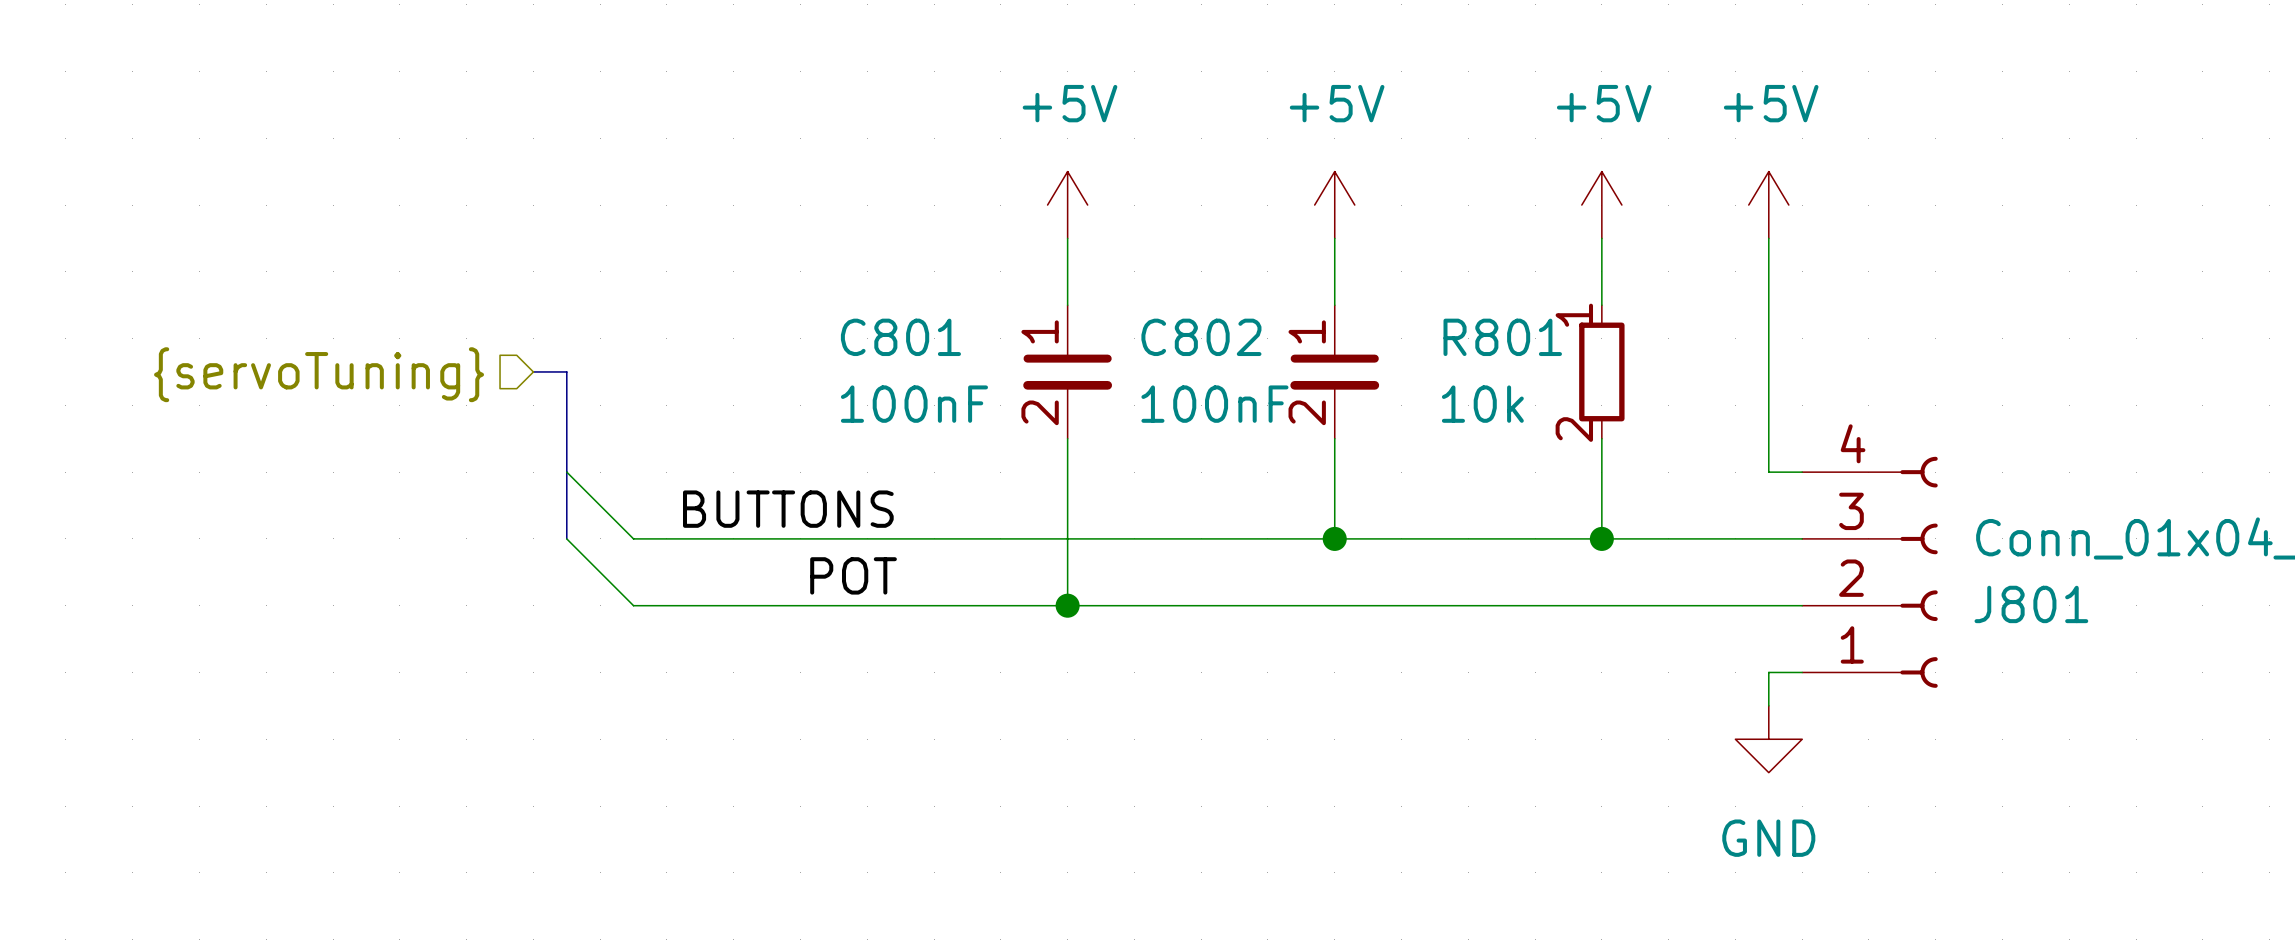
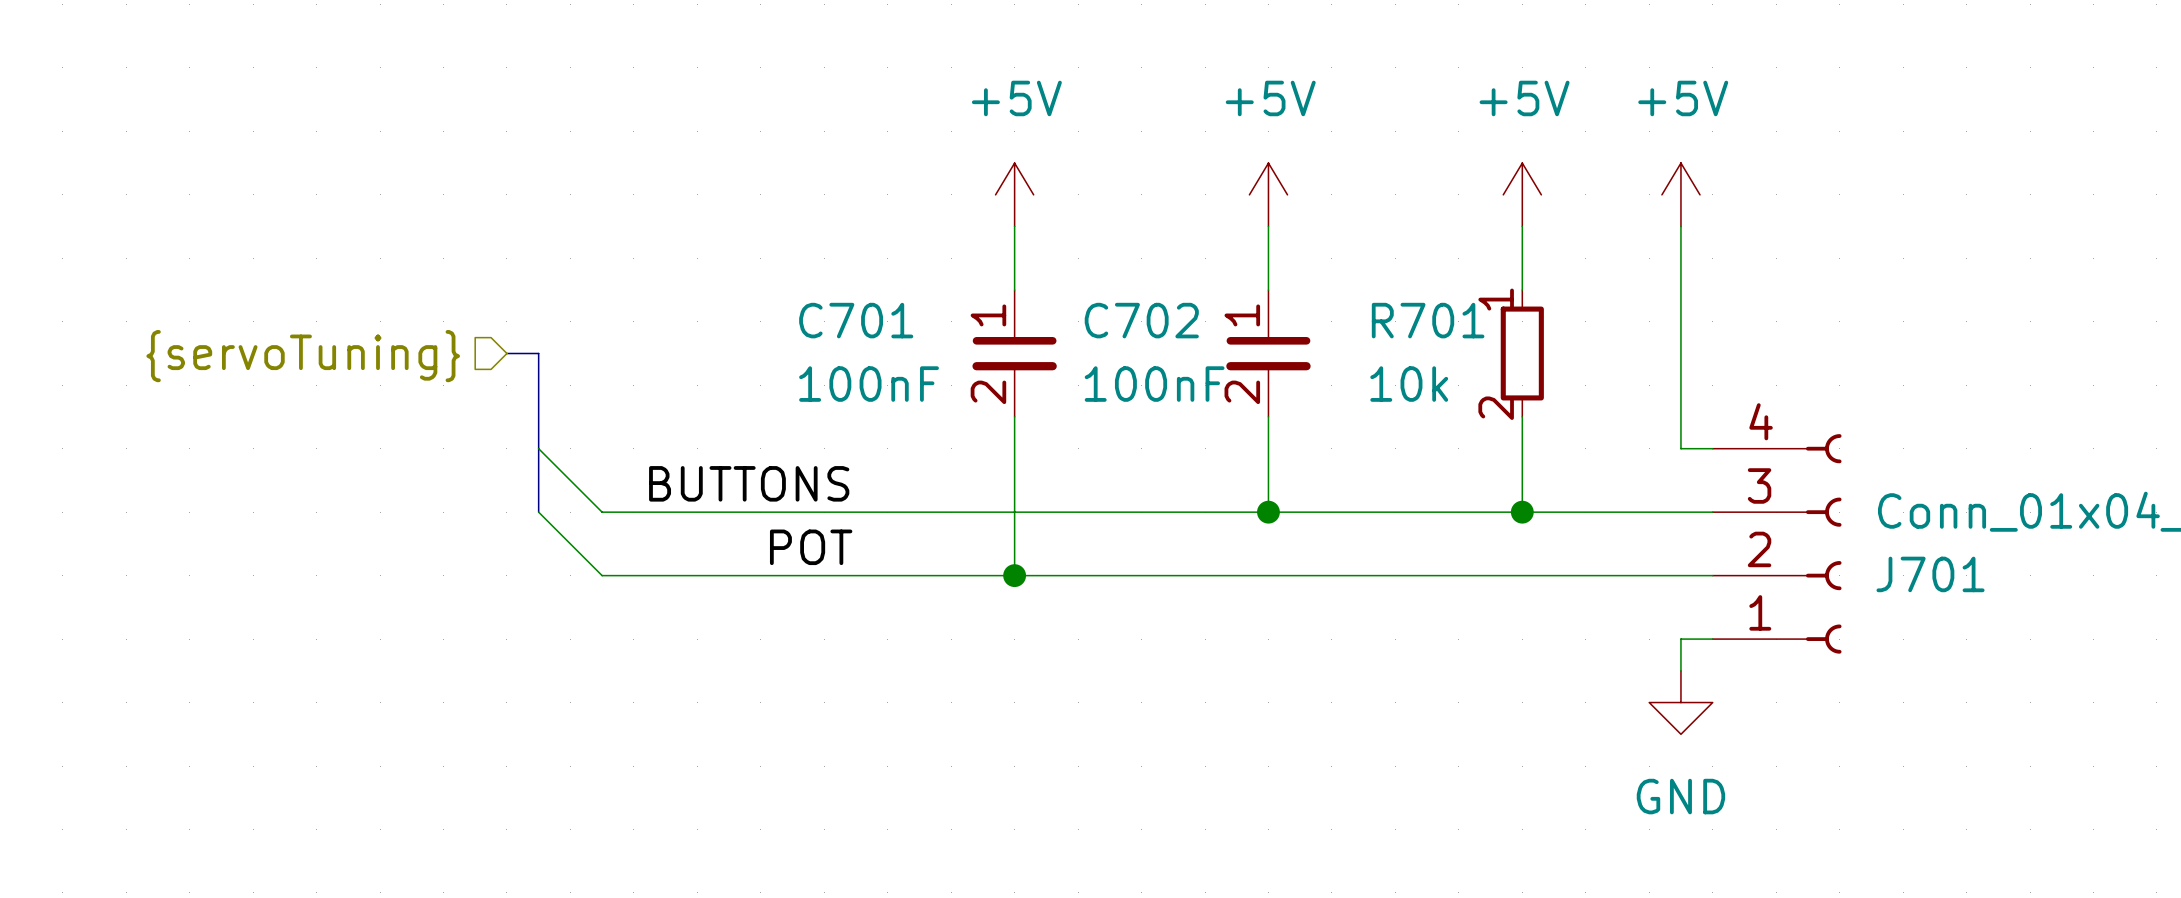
C801 name: C801 (900, 337) -> C701 (856, 320)
C802 name: C802 (1201, 337) -> C702 (1141, 320)
R801 name: R801 (1502, 337) -> R701 (1428, 320)
J801 name: J801 (2031, 604) -> J701 (1930, 574)

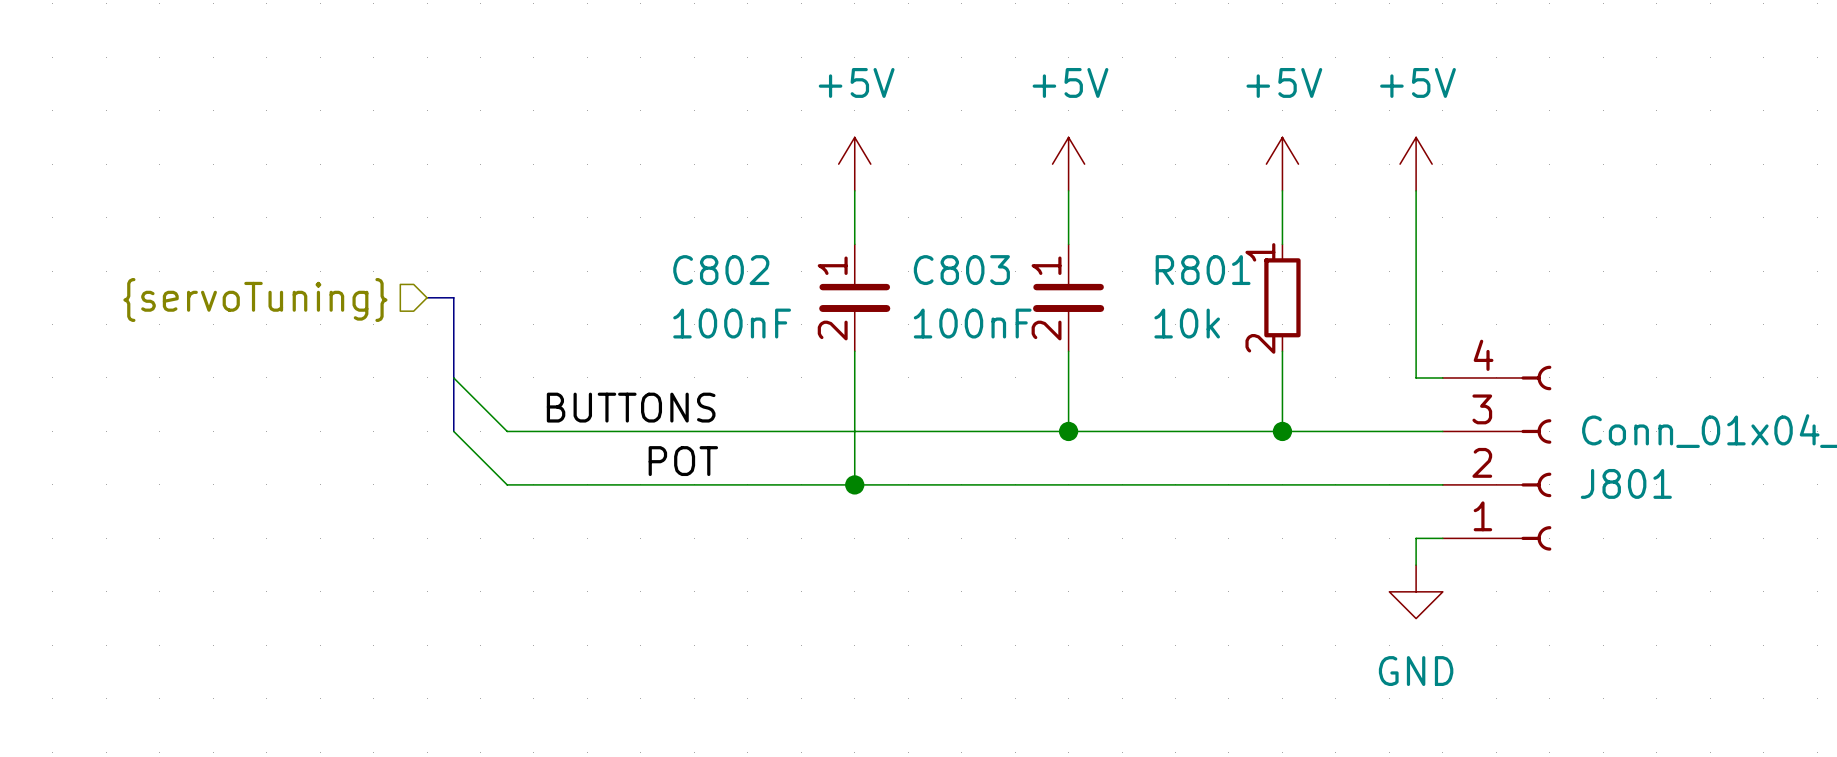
C701 name: C701 (856, 320) -> C802 (721, 270)
C702 name: C702 (1141, 320) -> C803 (961, 270)
R701 name: R701 (1428, 320) -> R801 (1203, 270)
J701 name: J701 (1930, 574) -> J801 (1626, 483)

